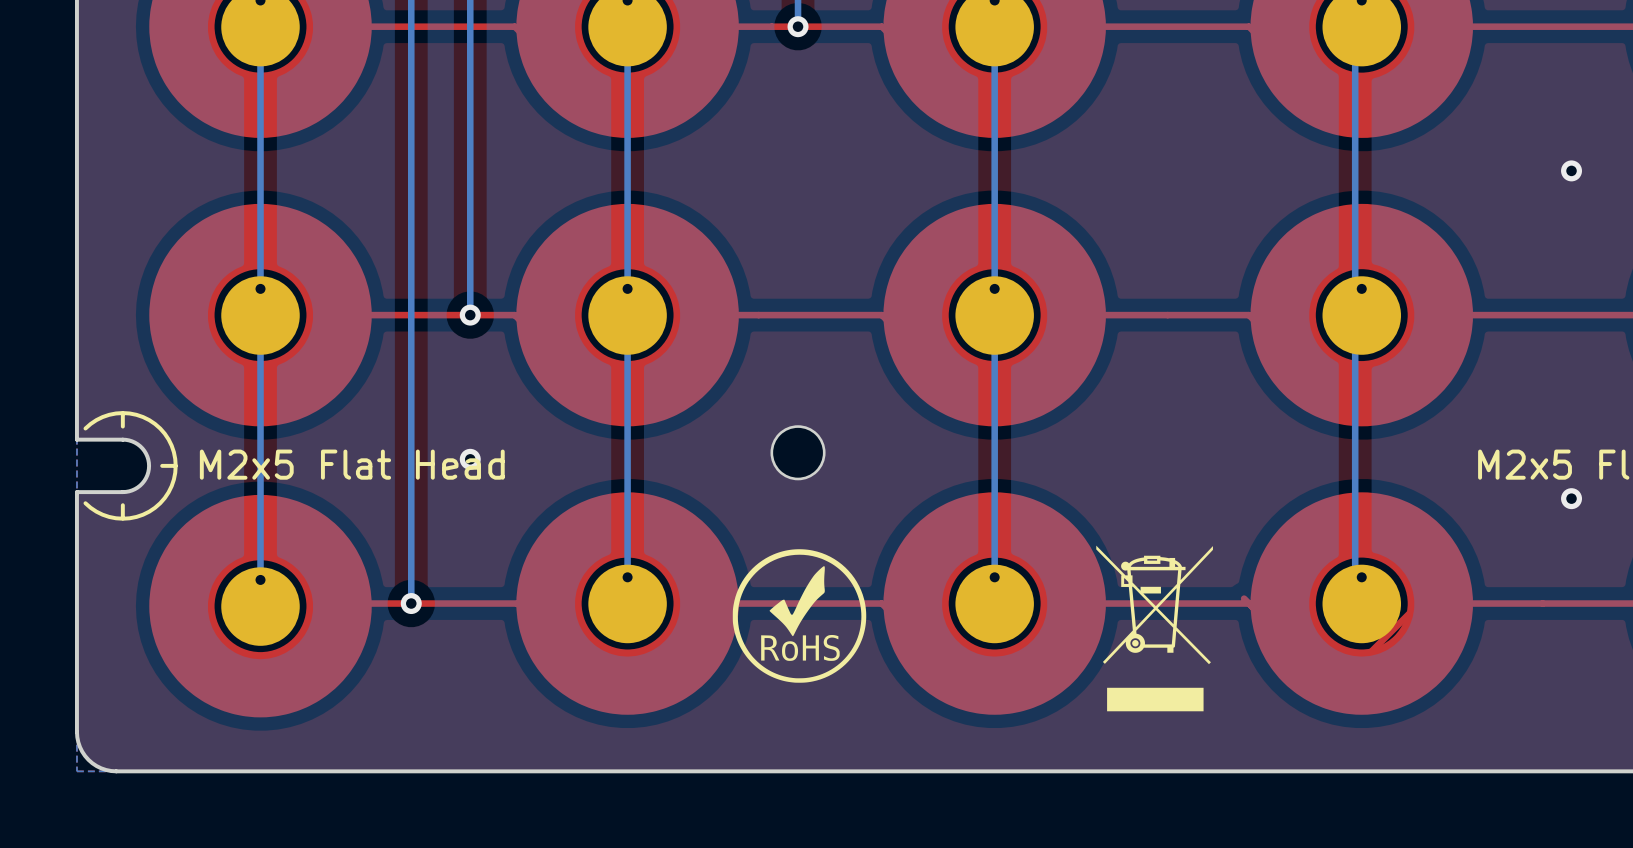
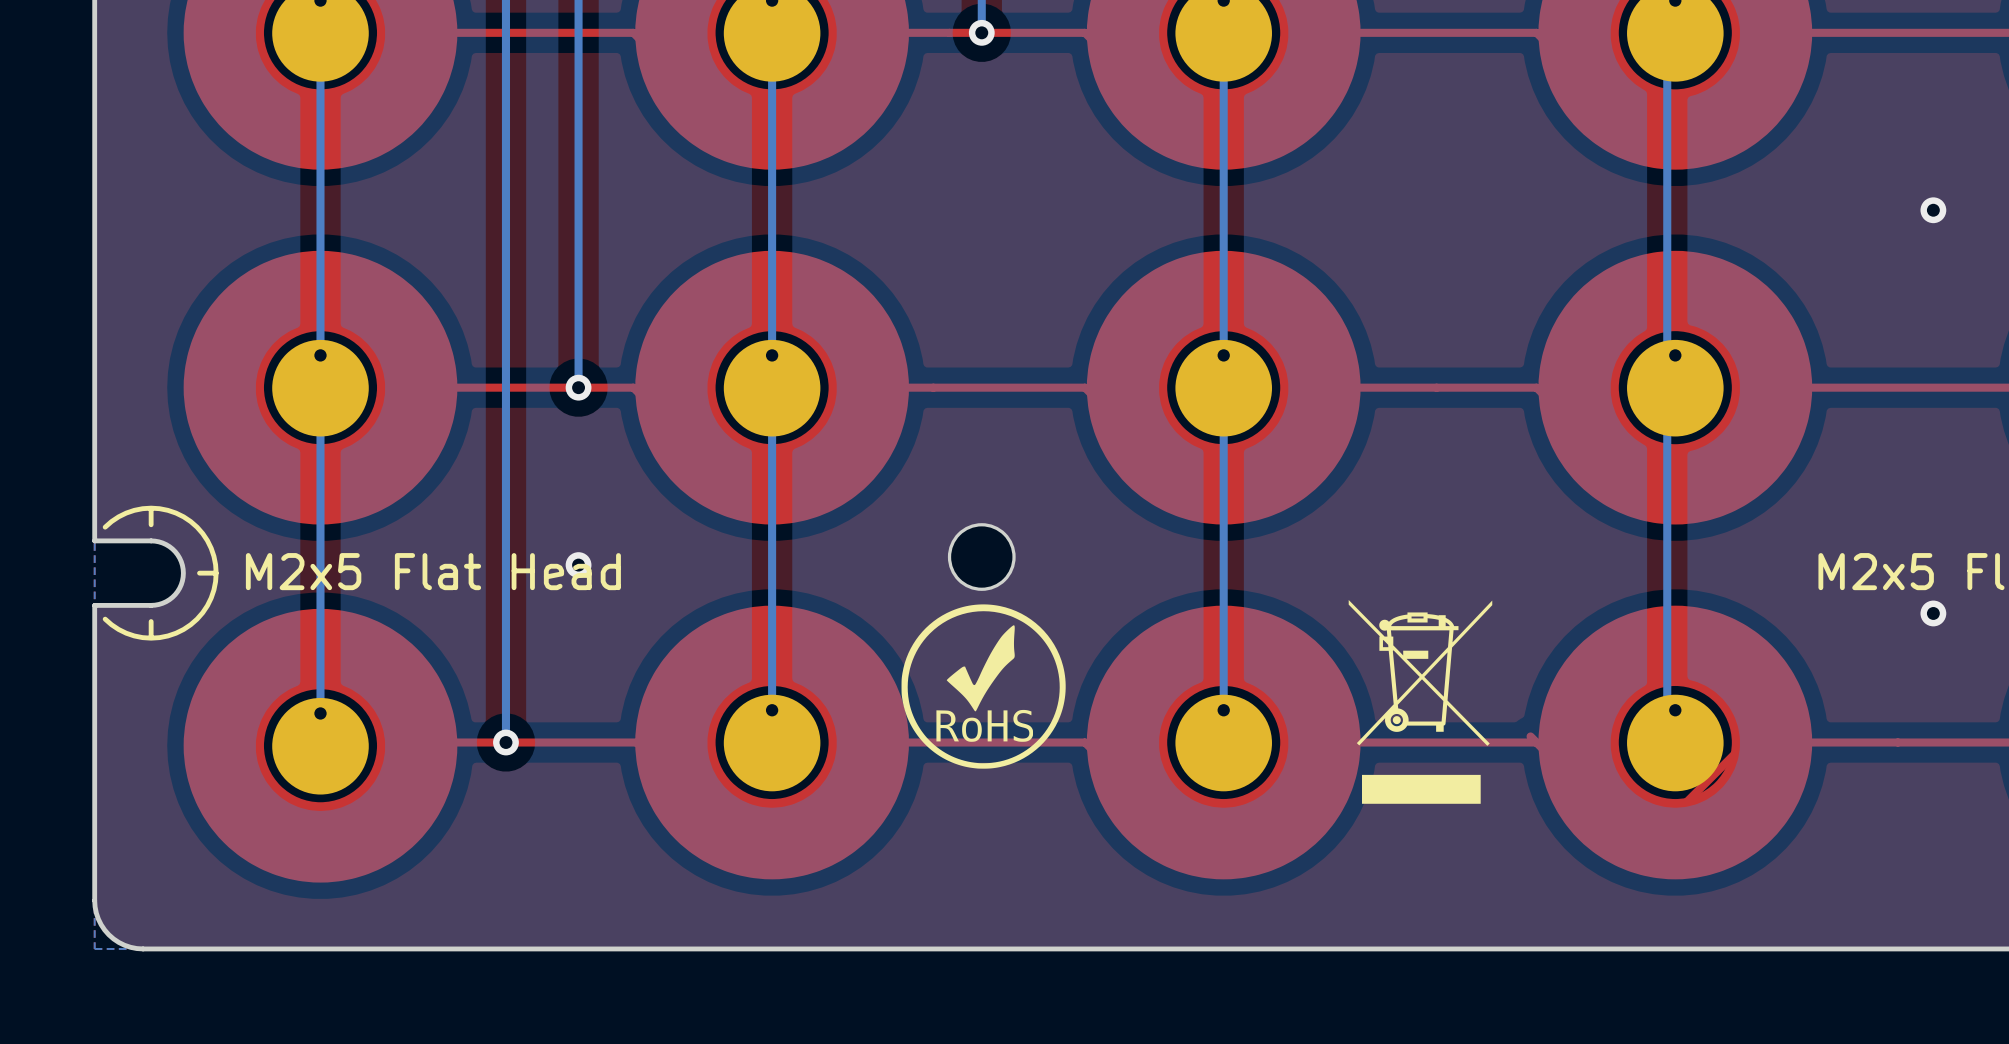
drawing position: (797, 601) -> (980, 668)
drawing position: (1154, 604) -> (1420, 672)
drawing position: (799, 615) -> (983, 686)
drawing position: (1135, 643) -> (1396, 720)
drawing position: (770, 647) -> (947, 725)
drawing position: (810, 647) -> (997, 725)
drawing position: (831, 647) -> (1023, 725)
drawing position: (790, 651) -> (971, 729)
drawing position: (1155, 699) -> (1421, 789)

